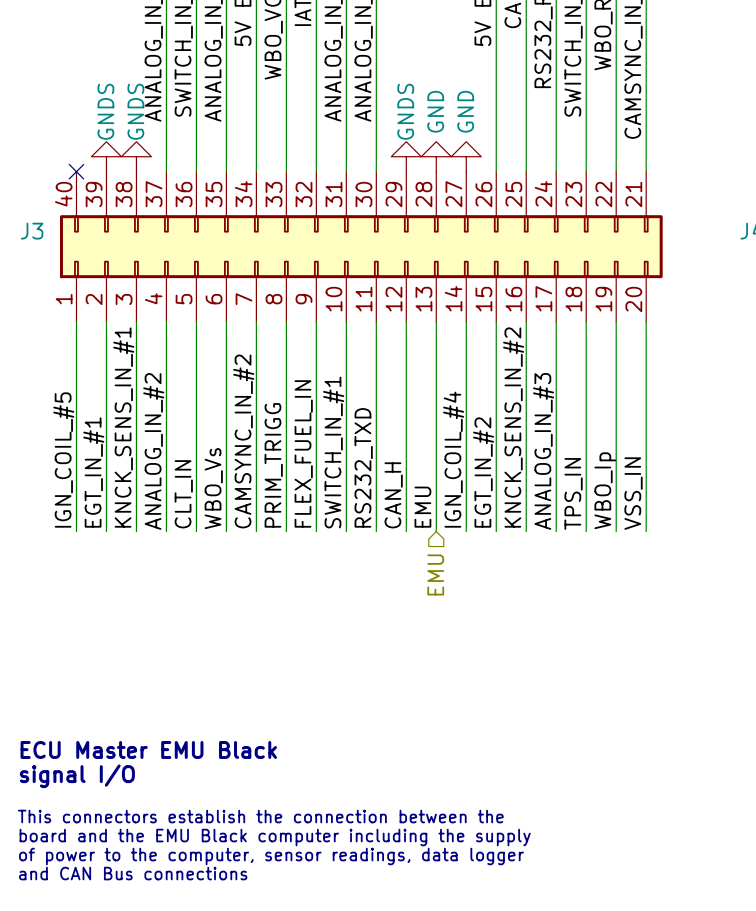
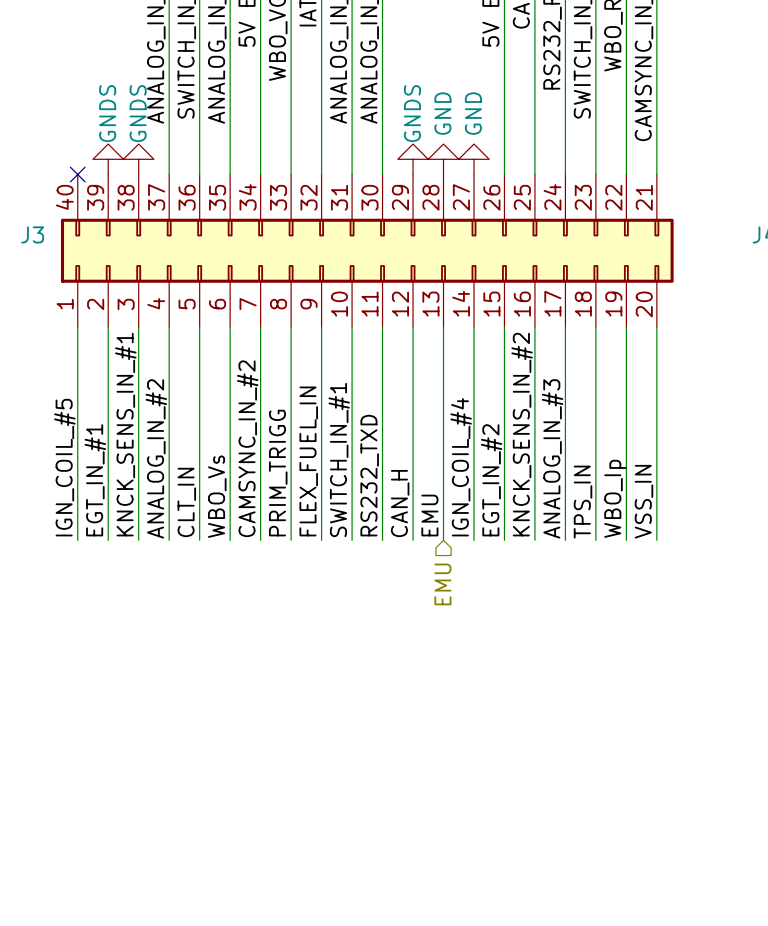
text: ECU Master EMU Black (148, 749) -> none
text: signal I/O (77, 776) -> none
text: This connectors establish the connection between the (260, 816) -> none
text: board and the EMU Black computer including the supply (275, 837) -> none
text: of power to the computer, sensor readings, data logger (271, 856) -> none
text: and CAN Bus connections (133, 873) -> none

